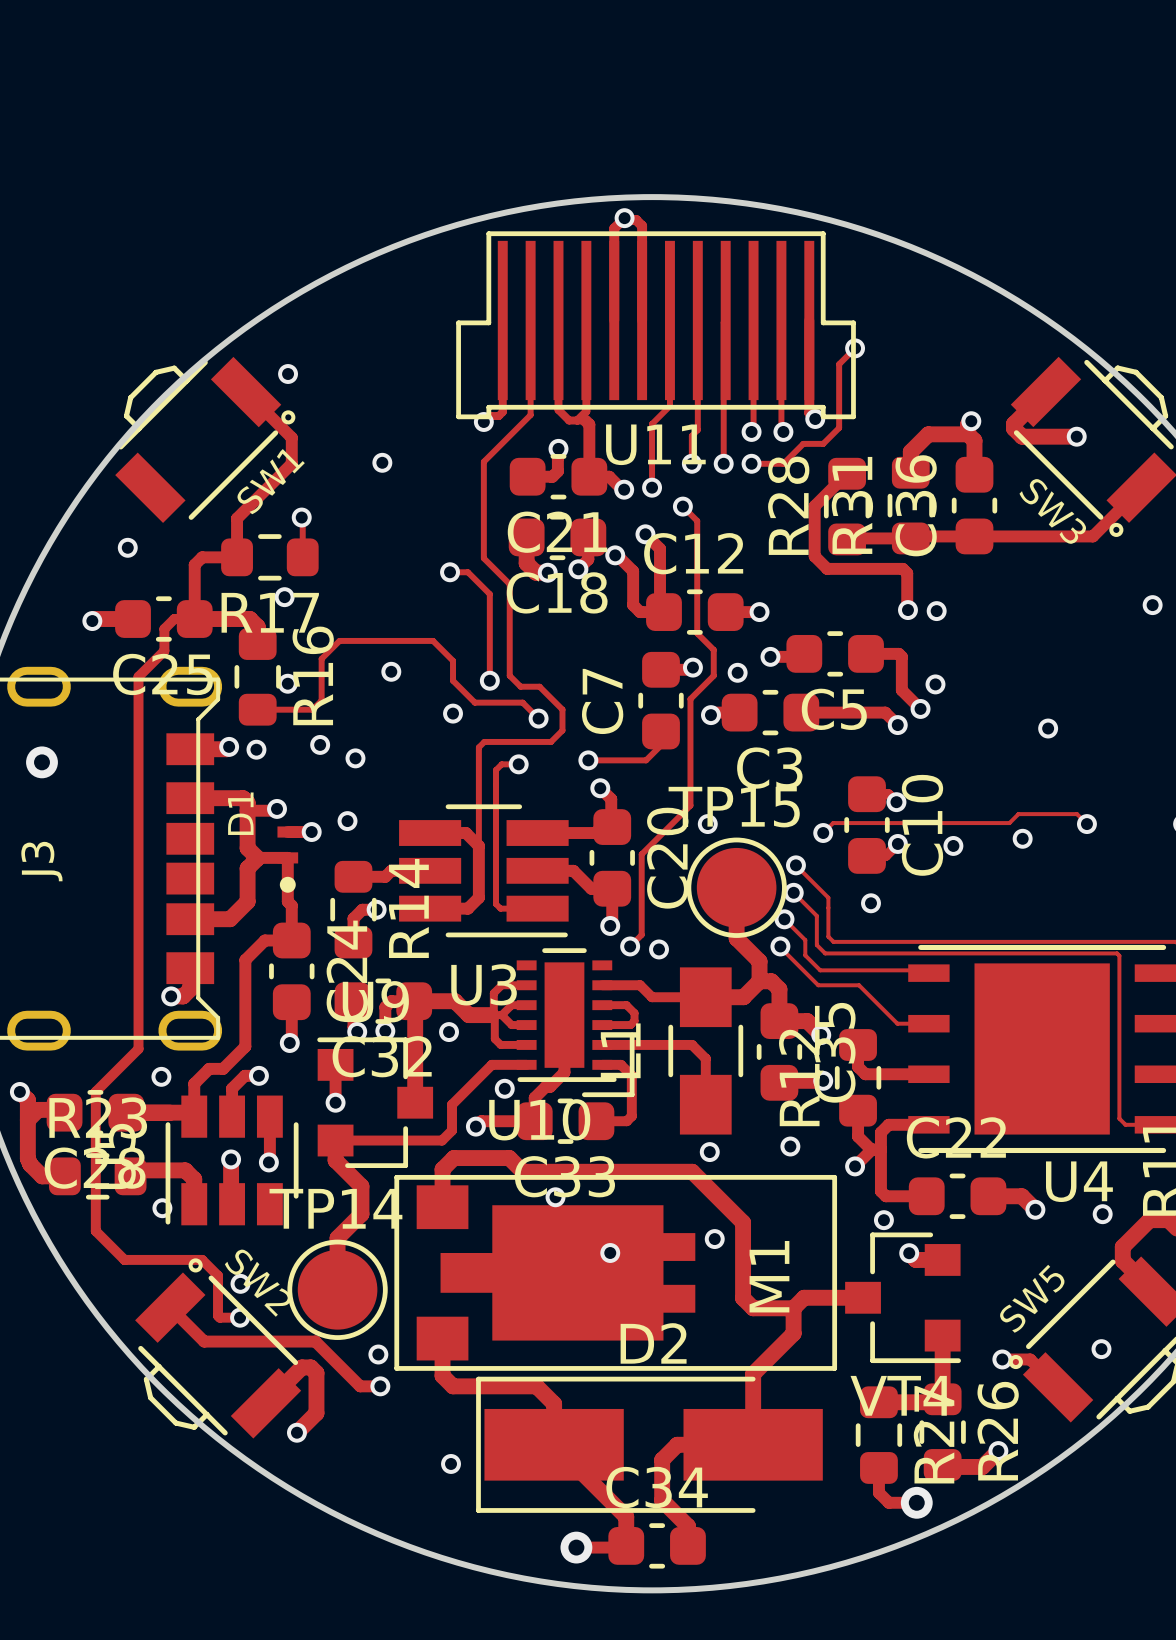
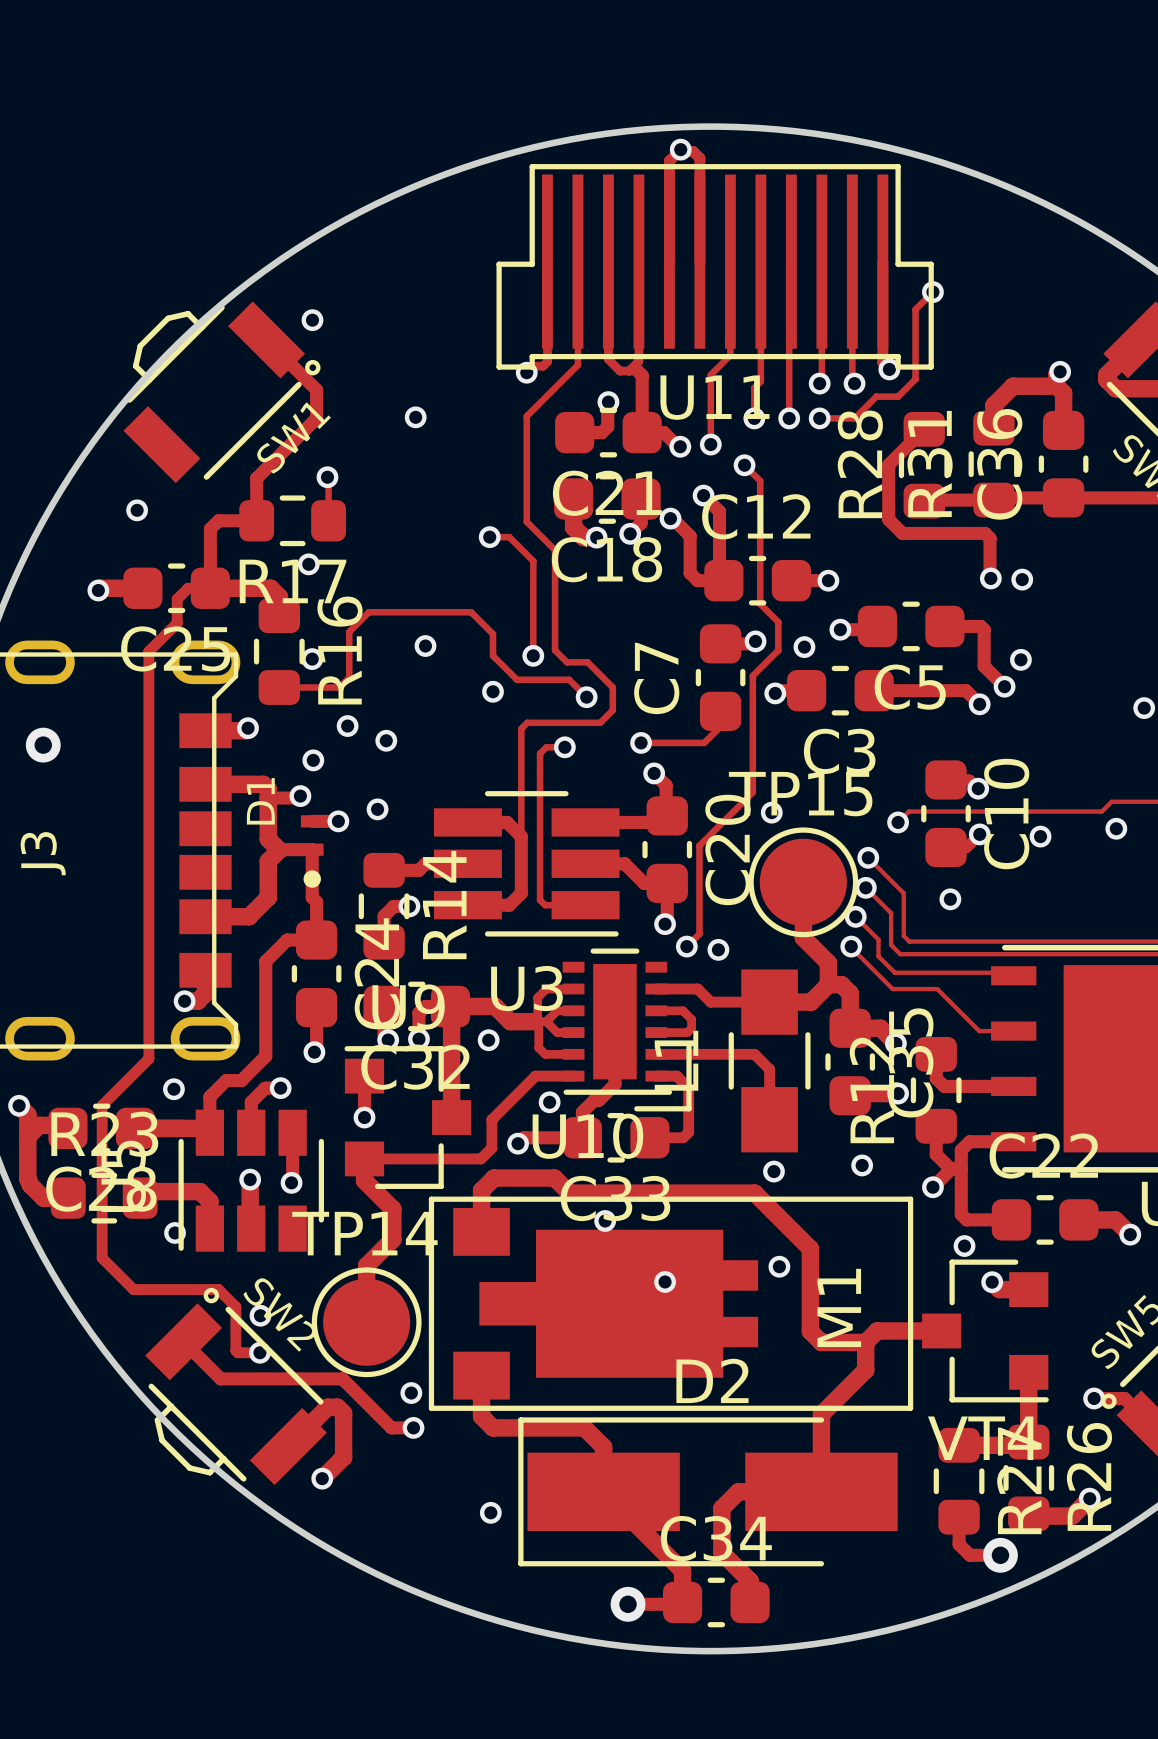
via position: (256, 749) -> (313, 760)

